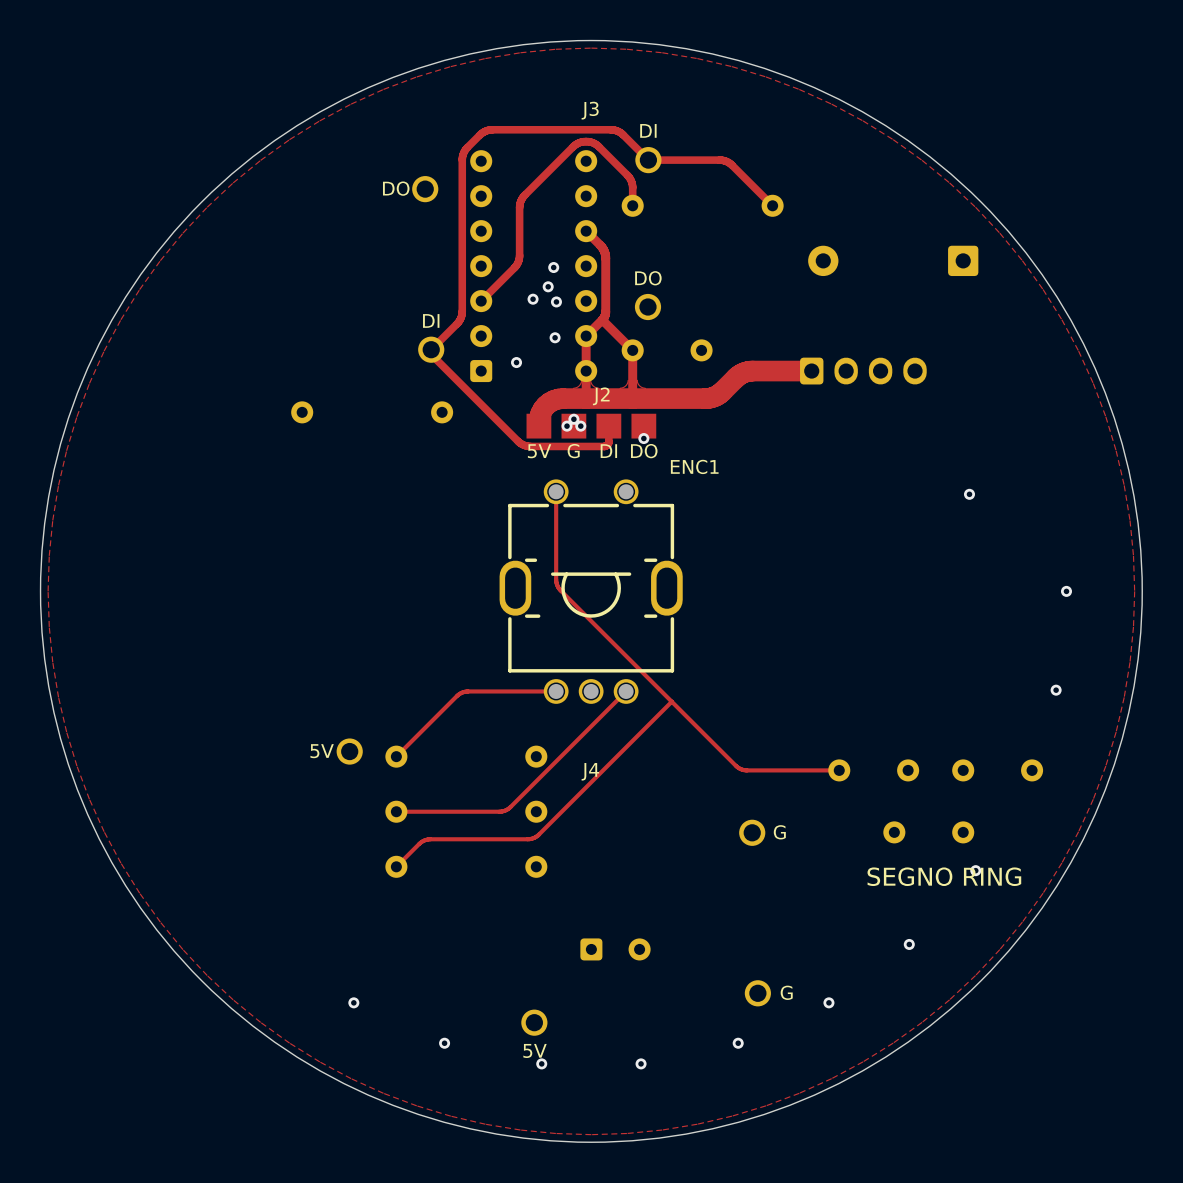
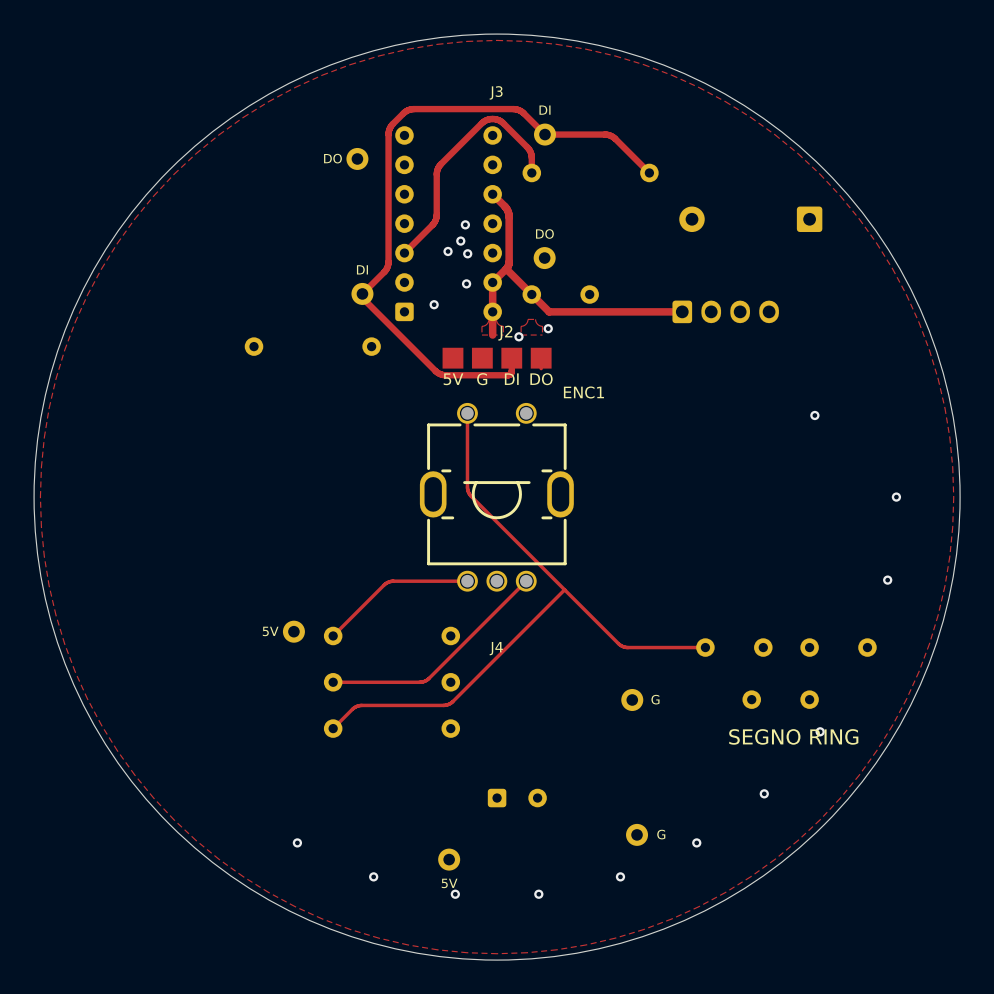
J3 footprint: [412, 147, 771, 1036] -> [346, 123, 649, 871]
J4 footprint: [336, 293, 766, 846] -> [282, 247, 644, 711]
track: (632, 350) (632, 398) -> none
track: (752, 371) (739, 375) (718, 394) (707, 398) (558, 399) (545, 405) (540, 413) (538, 422) -> (632, 311) (549, 311) (531, 294)
track width: thick (752, 371) (811, 371) -> thin (632, 311) (682, 311)
via: none -> (548, 328)
via: none -> (518, 336)
via: (573, 419) -> none
via: (567, 426) -> none
via: (580, 426) -> none
via: (643, 438) -> none

